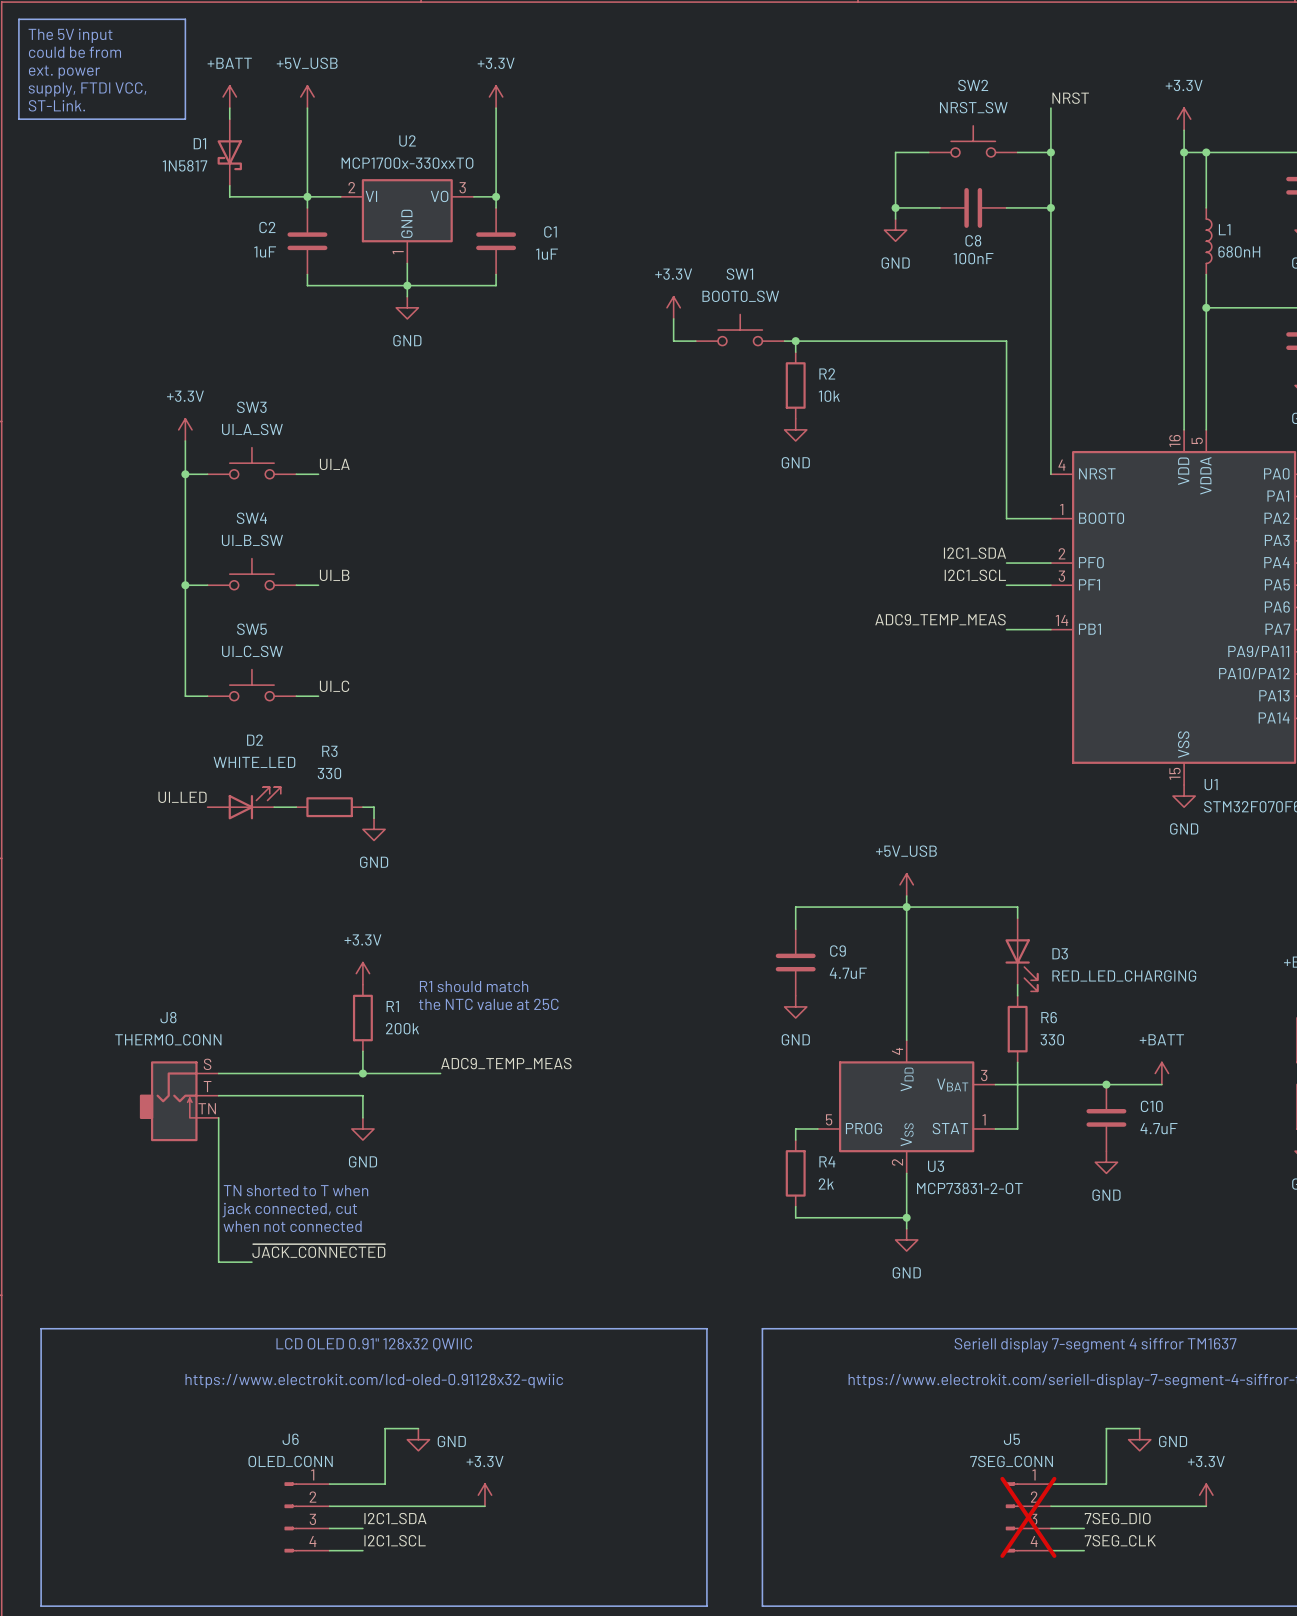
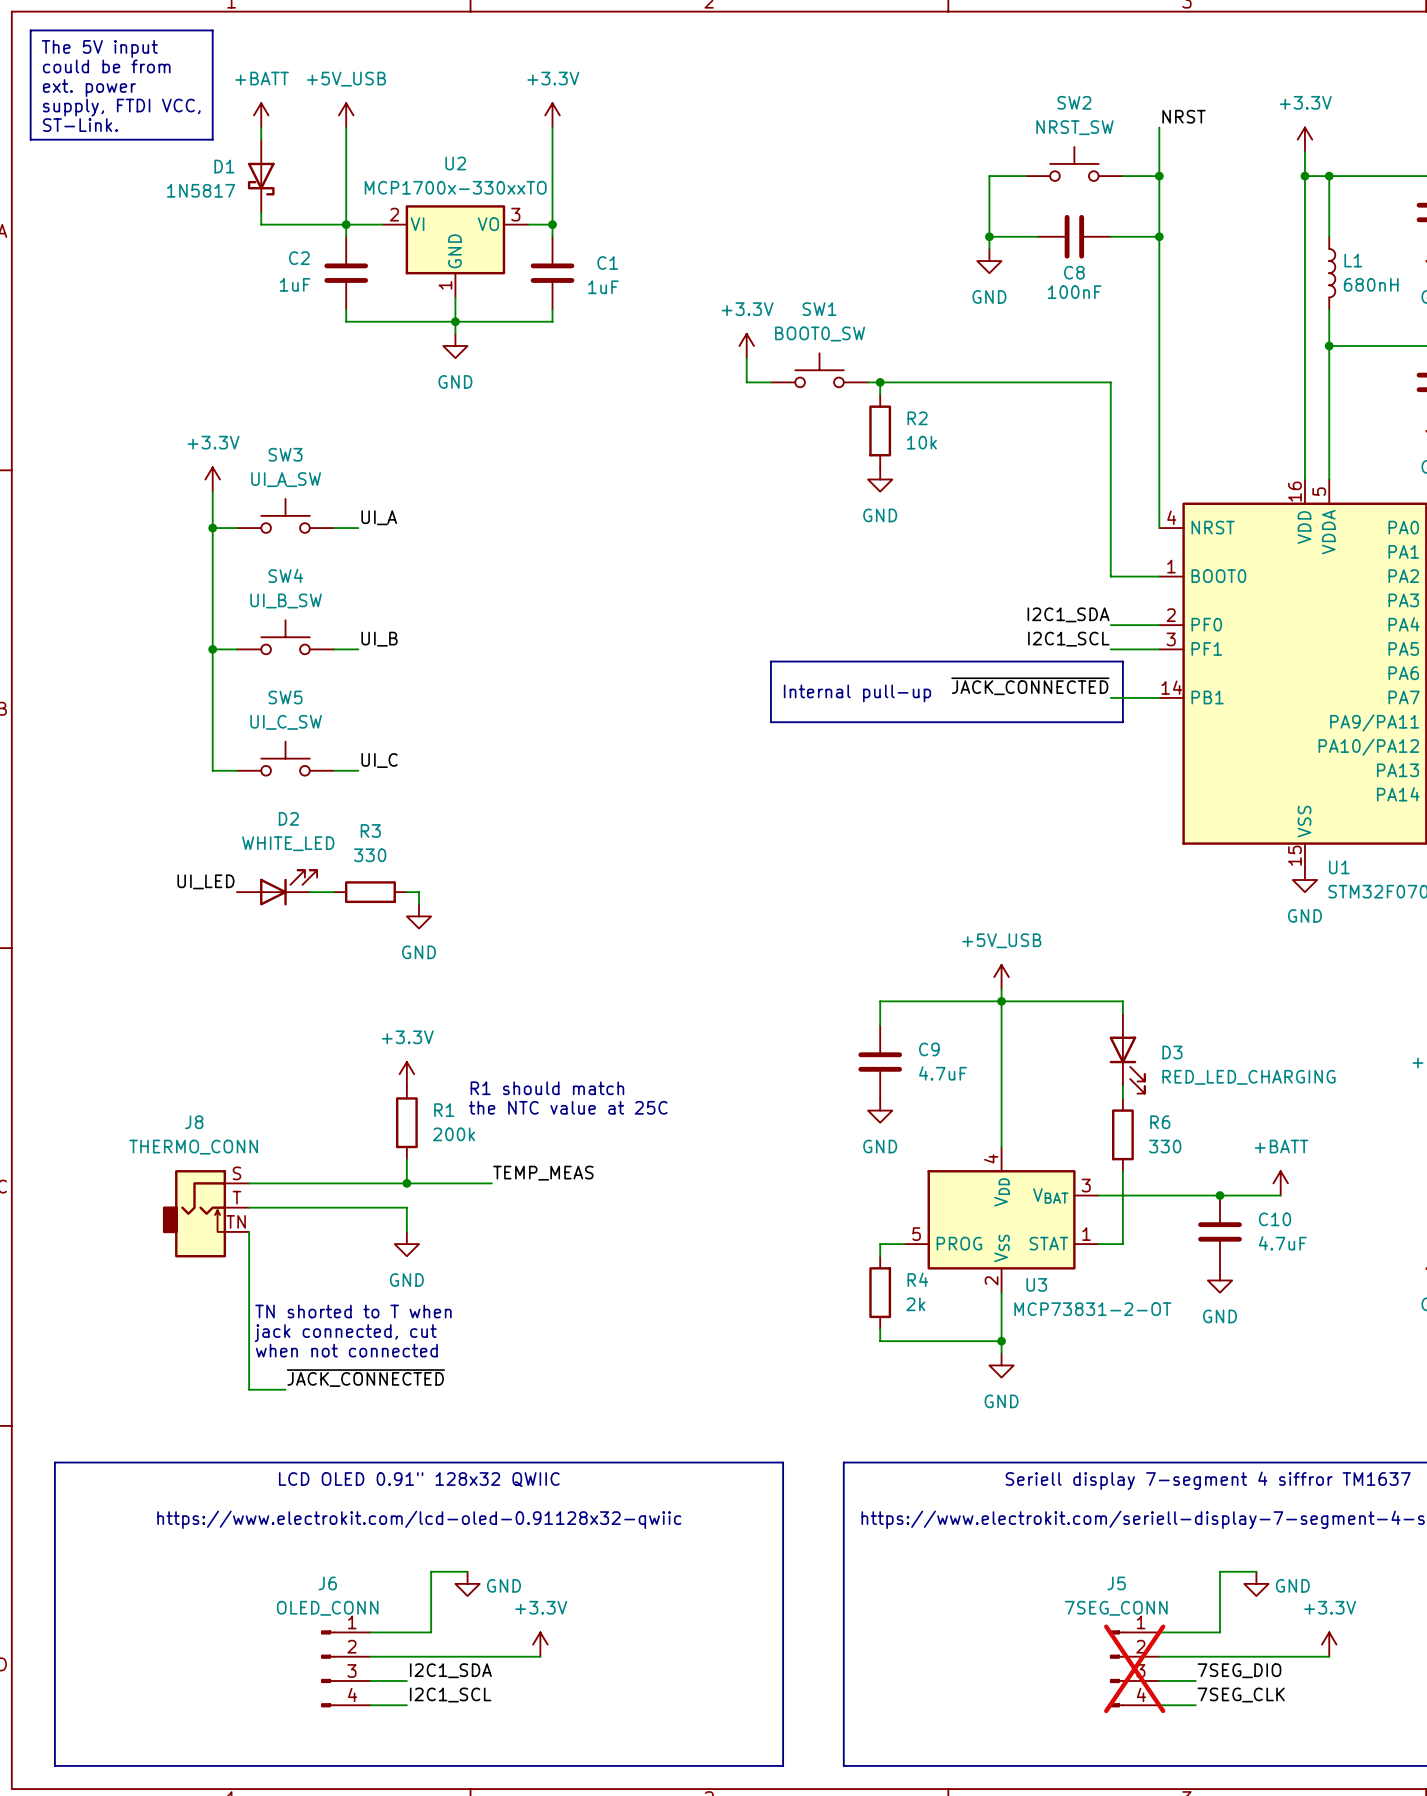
line: none -> (770, 661) (1122, 661) (1122, 722) (770, 722) (770, 661)
label: ADC9_TEMP_MEAS (940, 619) -> ~{JACK_CONNECTED} (1030, 686)
text: none -> Internal pull-up (857, 693)
label: ADC9_TEMP_MEAS (506, 1063) -> TEMP_MEAS (543, 1173)

